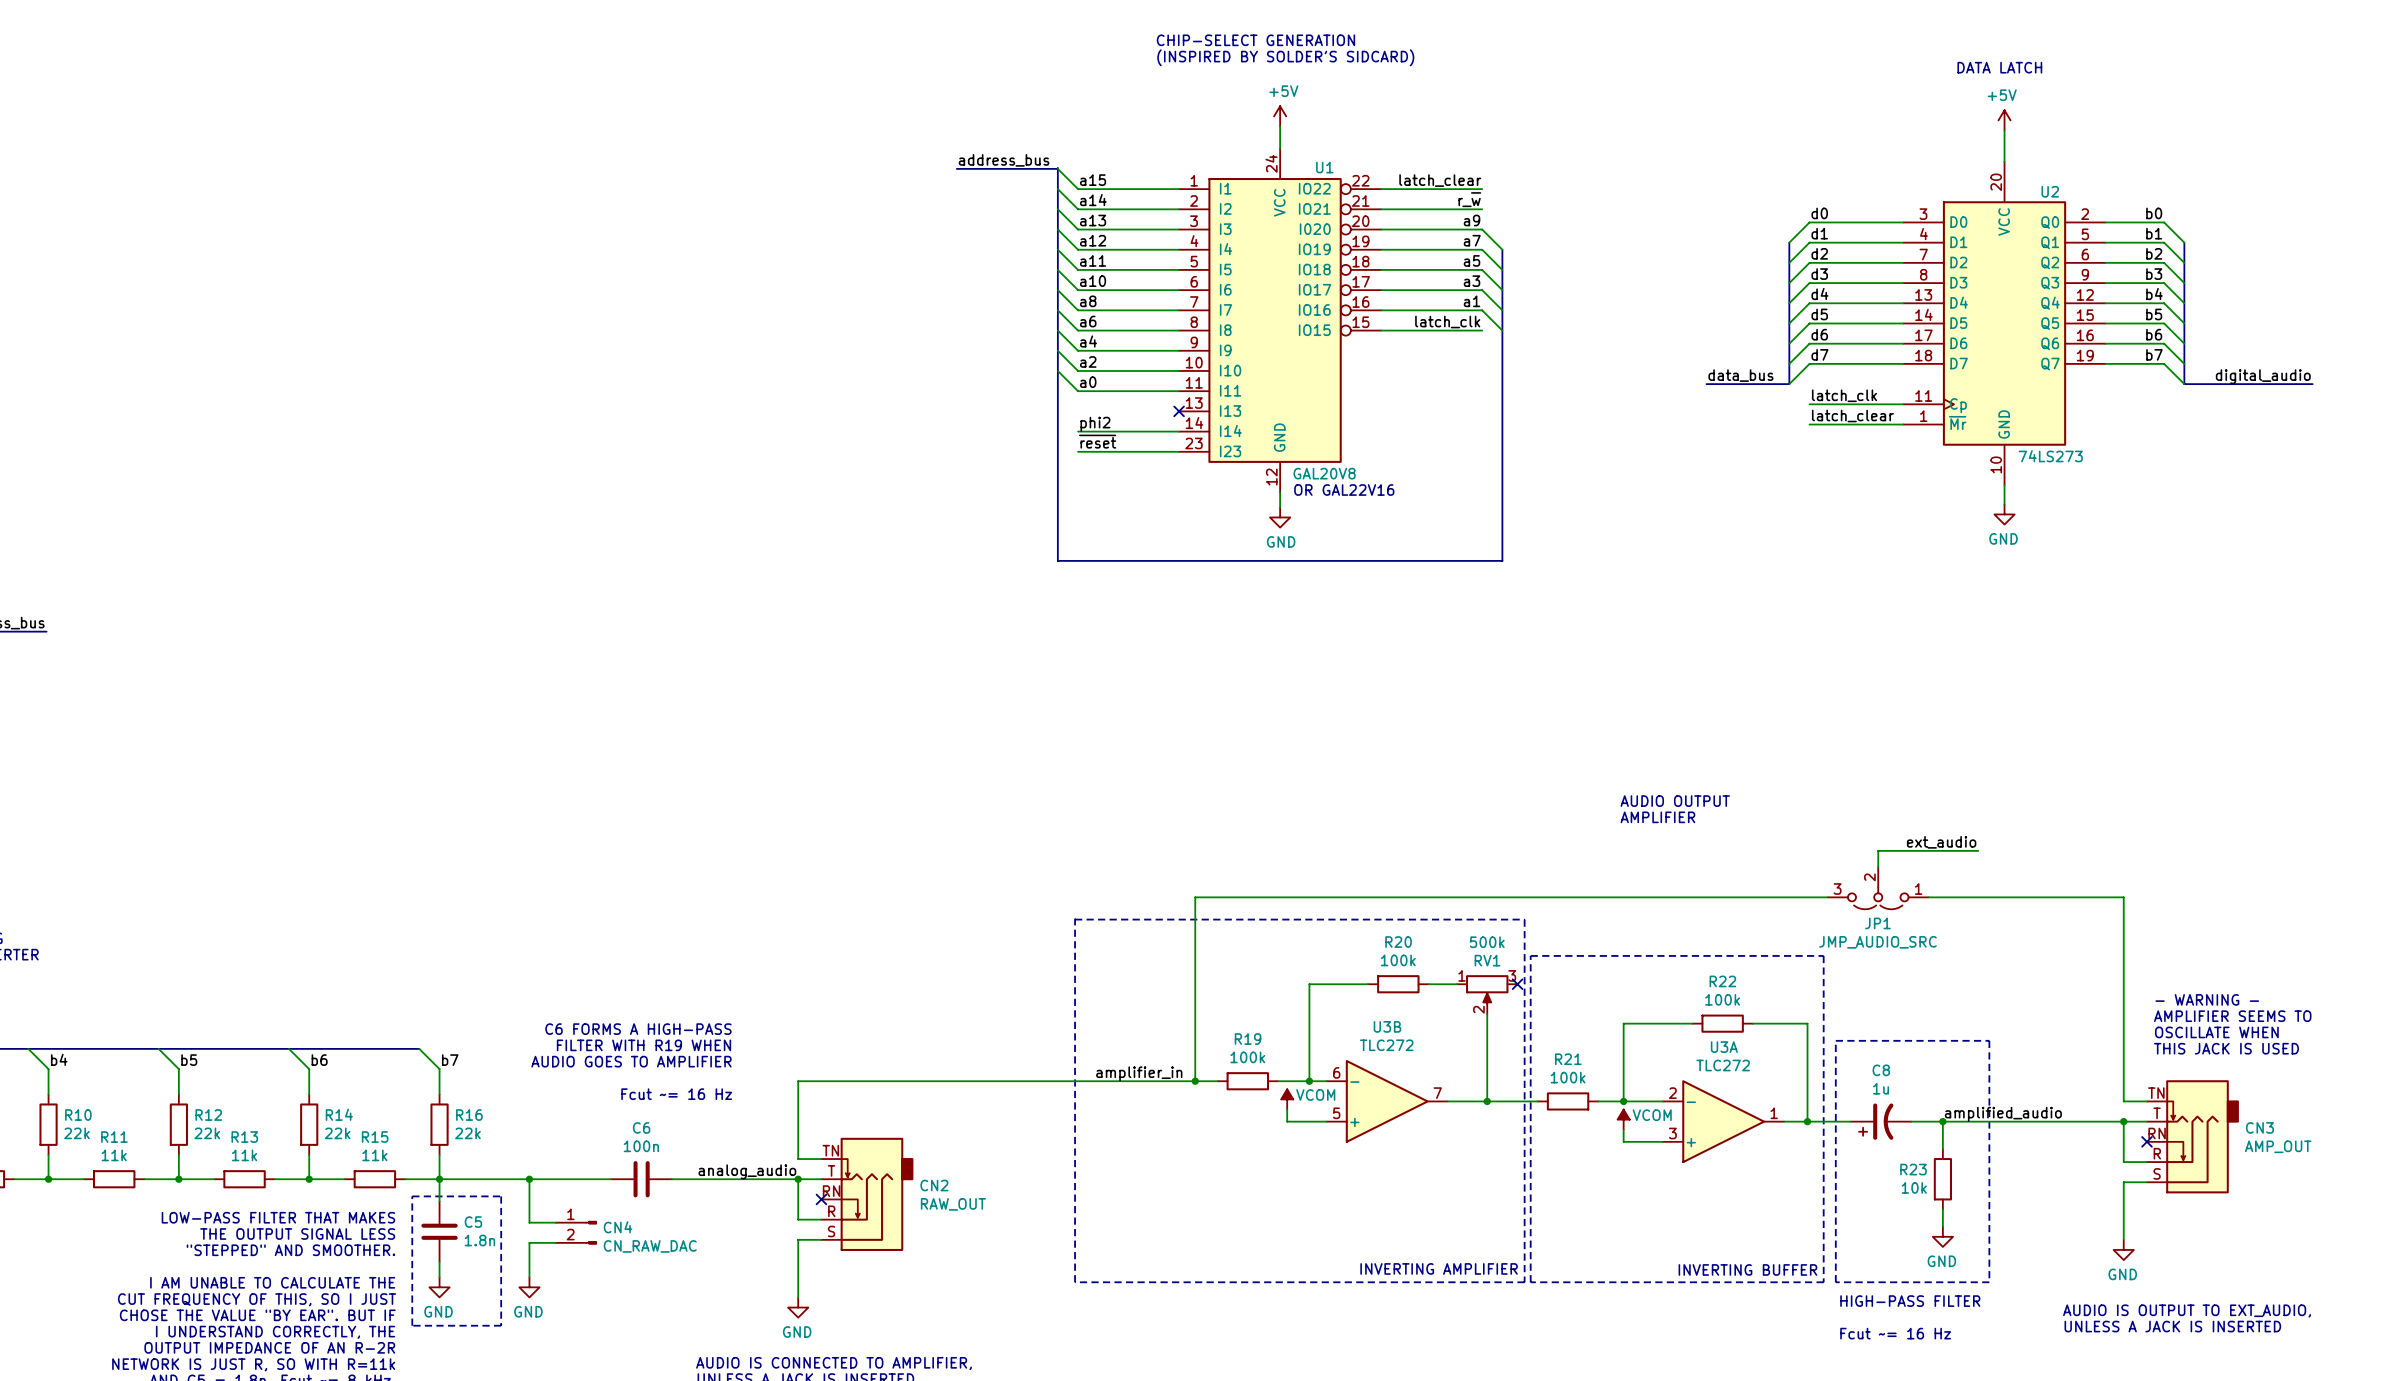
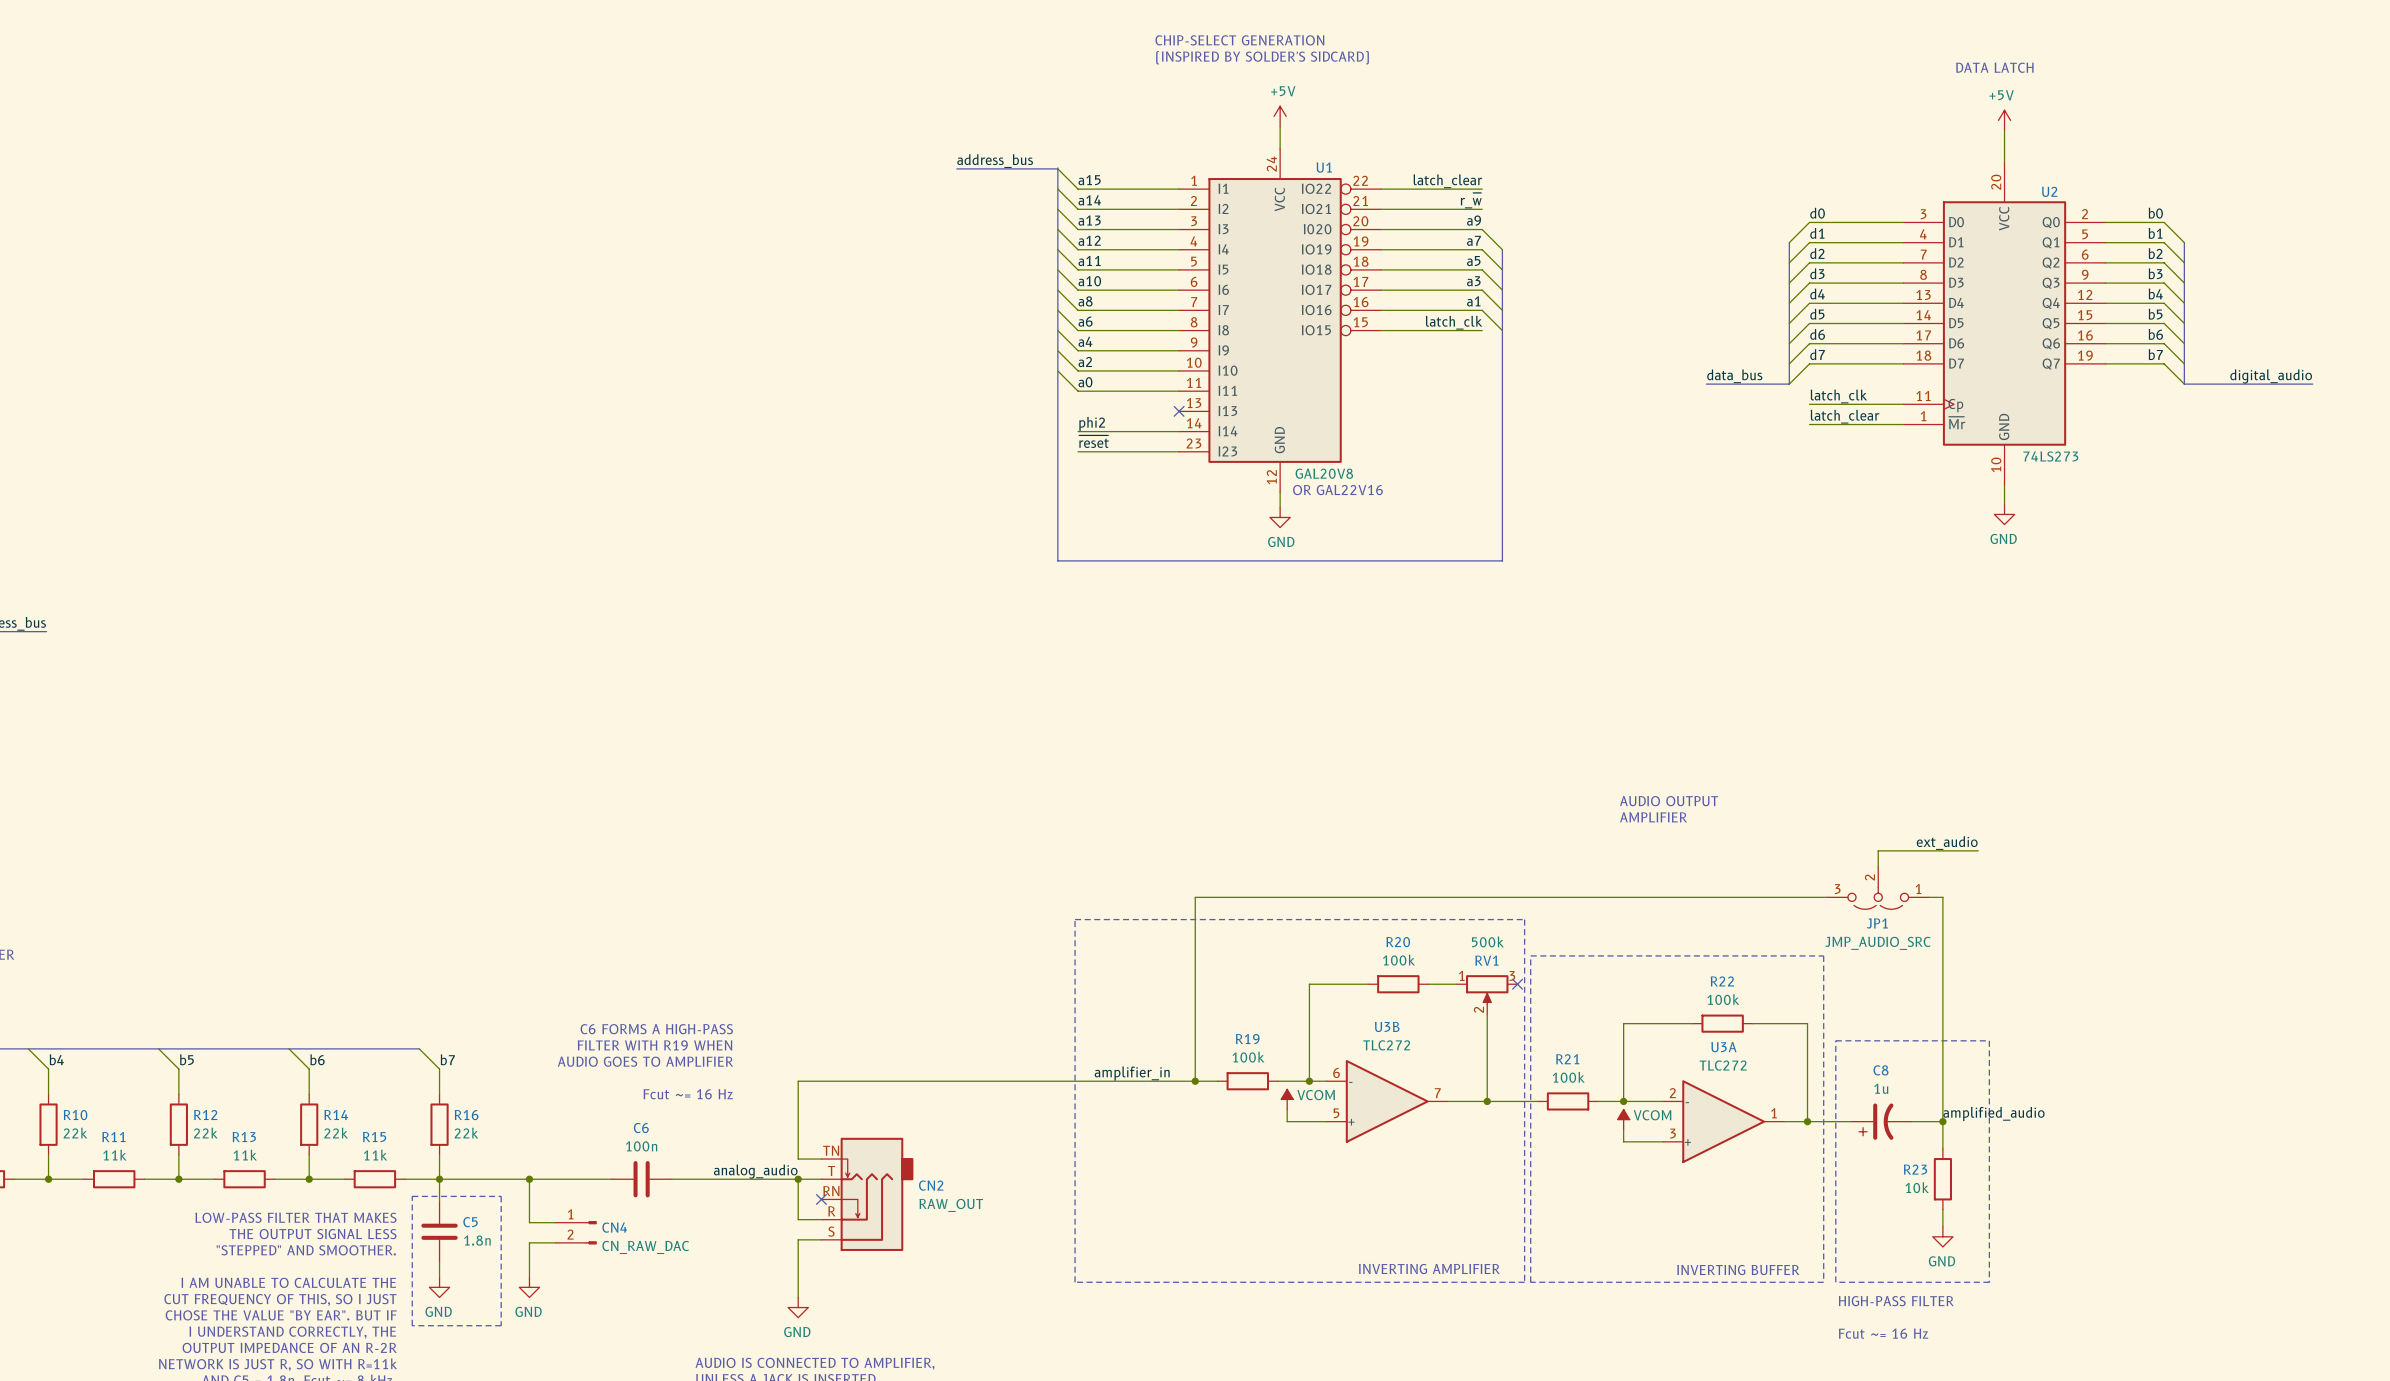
wire: (1942, 897) (2123, 897) (2123, 1101) (2146, 1101) -> (1942, 897) (1942, 1121)
text: - WARNING - (2207, 999) -> none
text: AMPLIFIER SEEMS TO (2232, 1016) -> none
text: OSCILLATE WHEN (2216, 1032) -> none
text: THIS JACK IS USED (2226, 1048) -> none
wire: (1942, 1121) (2146, 1121) -> none
wire: (2123, 1121) (2123, 1162) (2146, 1162) -> none
junction: (2123, 1121) -> none
CN3: AMP_OUT (2192, 1136) -> none
no-connect mark: (2146, 1141) -> none
wire: (2146, 1182) (2123, 1182) (2123, 1239) -> none
power symbol: GND (2123, 1249) -> none
text: AUDIO IS OUTPUT TO EXT_AUDIO, (2187, 1311) -> none
text: UNLESS A JACK IS INSERTED (2172, 1326) -> none

